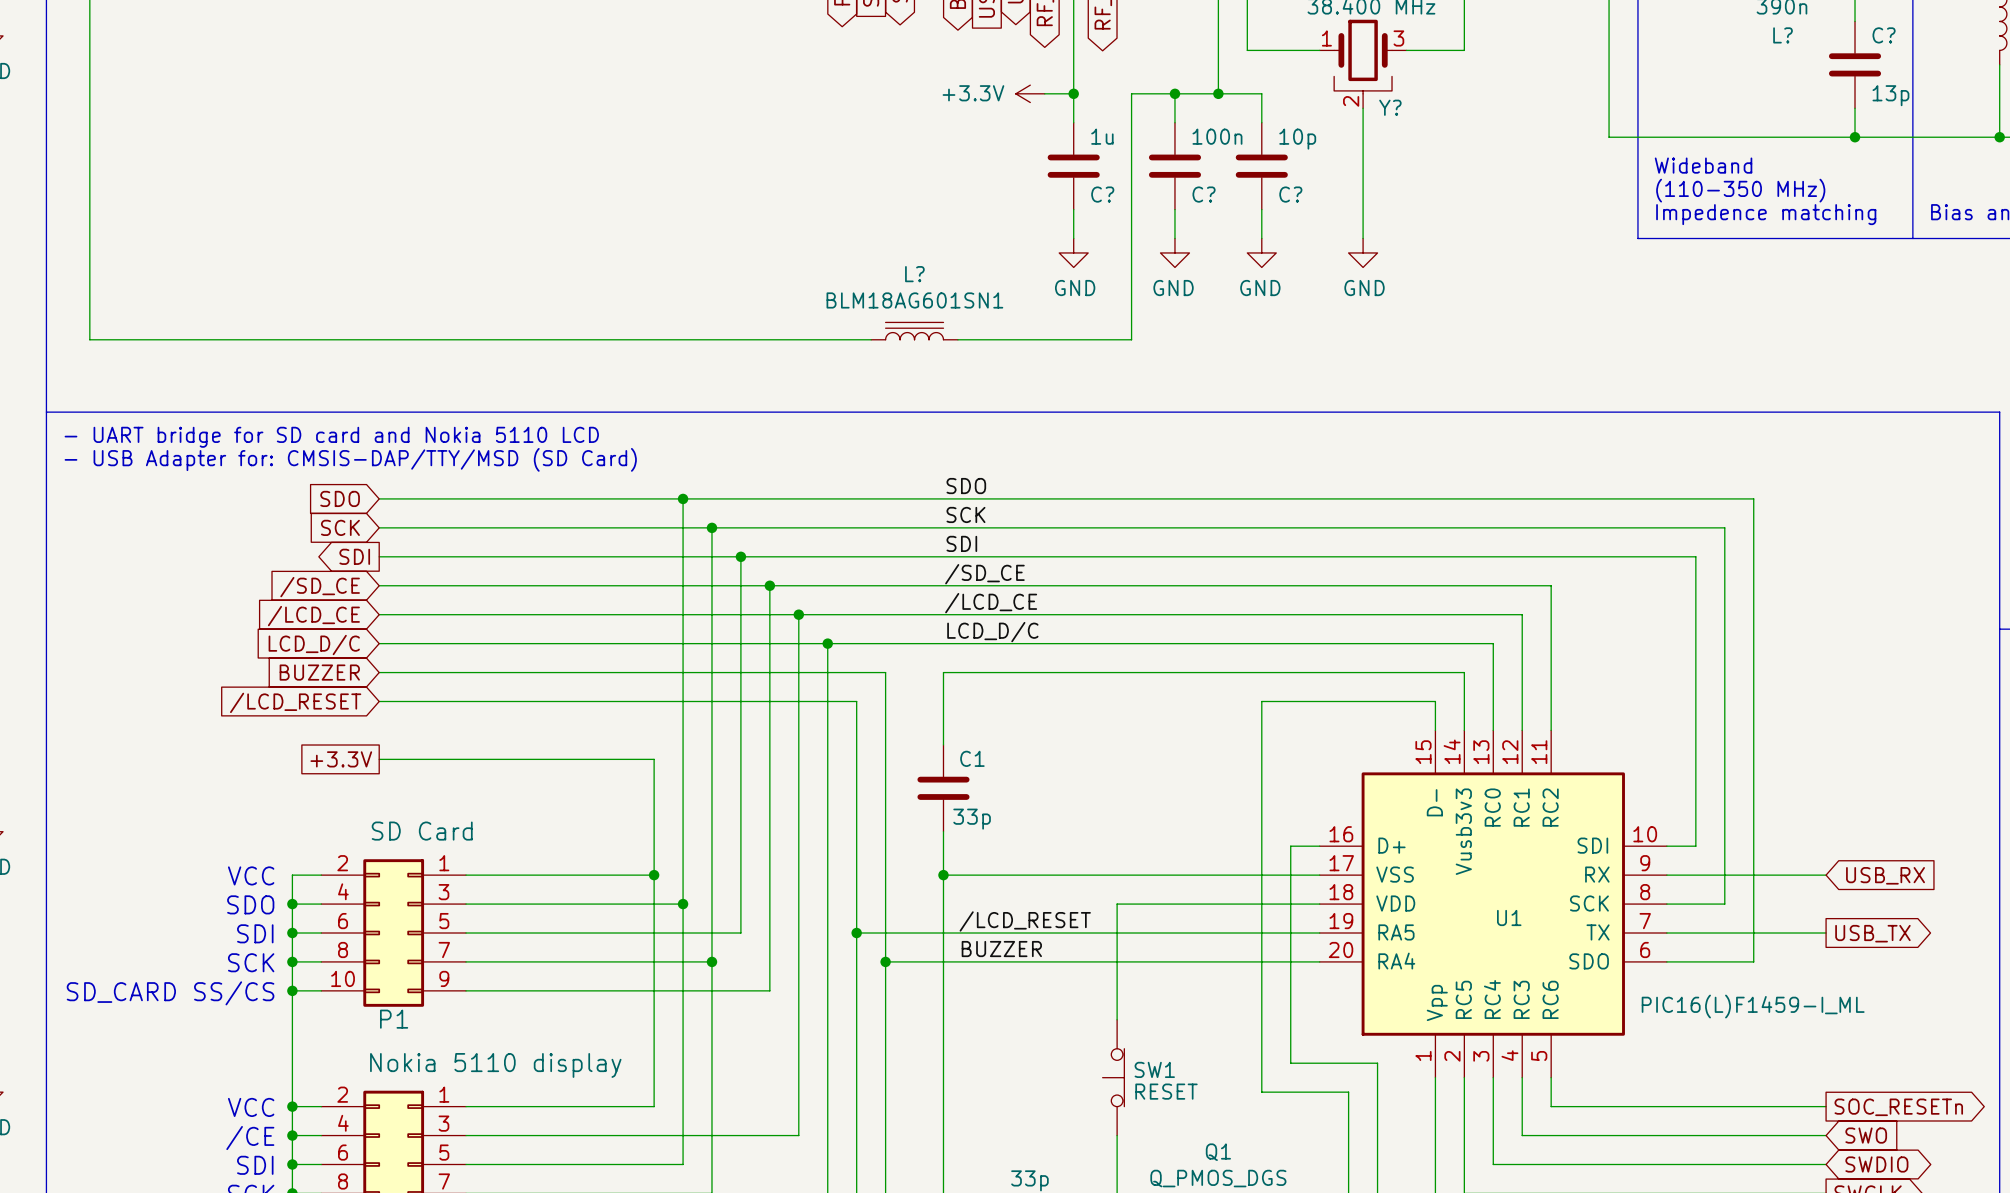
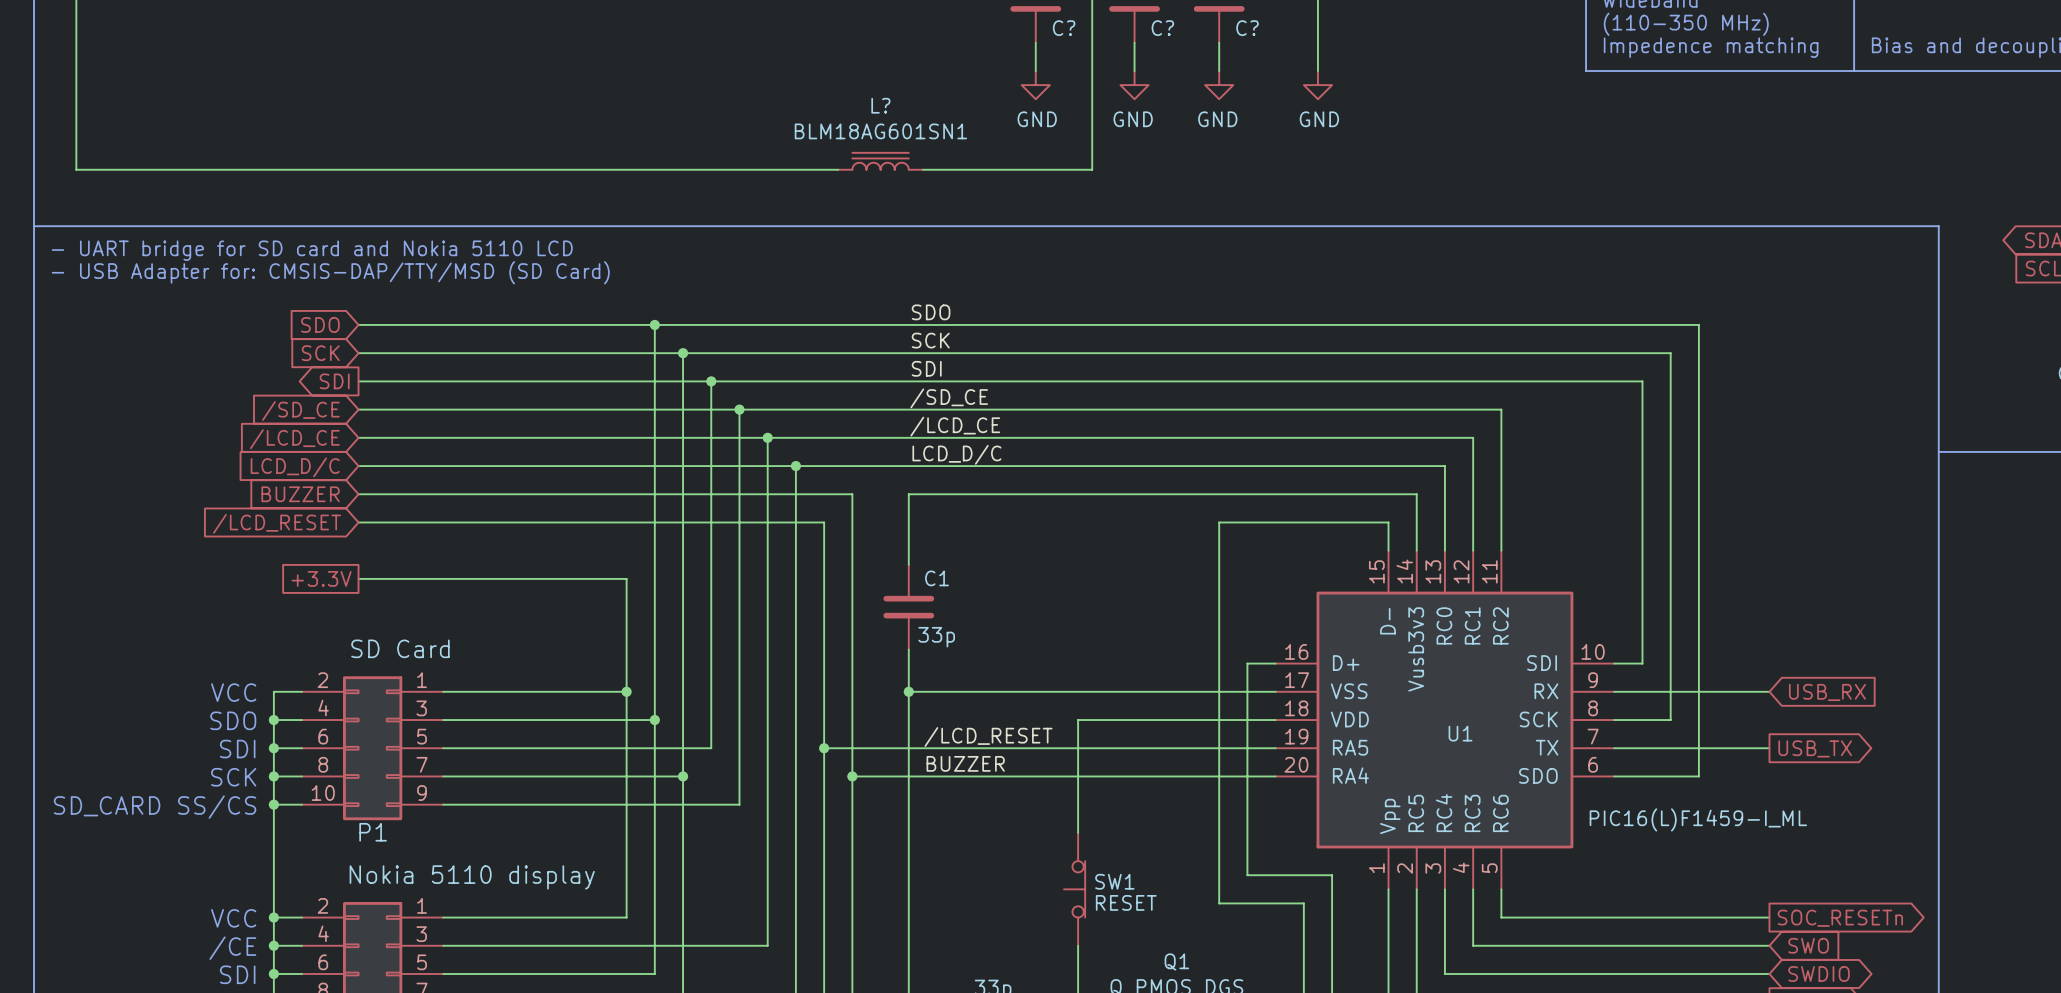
line: (46, 412) (1999, 412) -> (34, 226) (1938, 226) (1938, 240)
text position: - UART bridge for SD card and Nokia 5110 LCD (331, 437) -> - UART bridge for SD card and Nokia 5110 LCD (312, 250)
text position: - USB Adapter for: CMSIS-DAP/TTY/MSD (SD Card) (350, 459) -> - USB Adapter for: CMSIS-DAP/TTY/MSD (SD Card) (330, 272)

